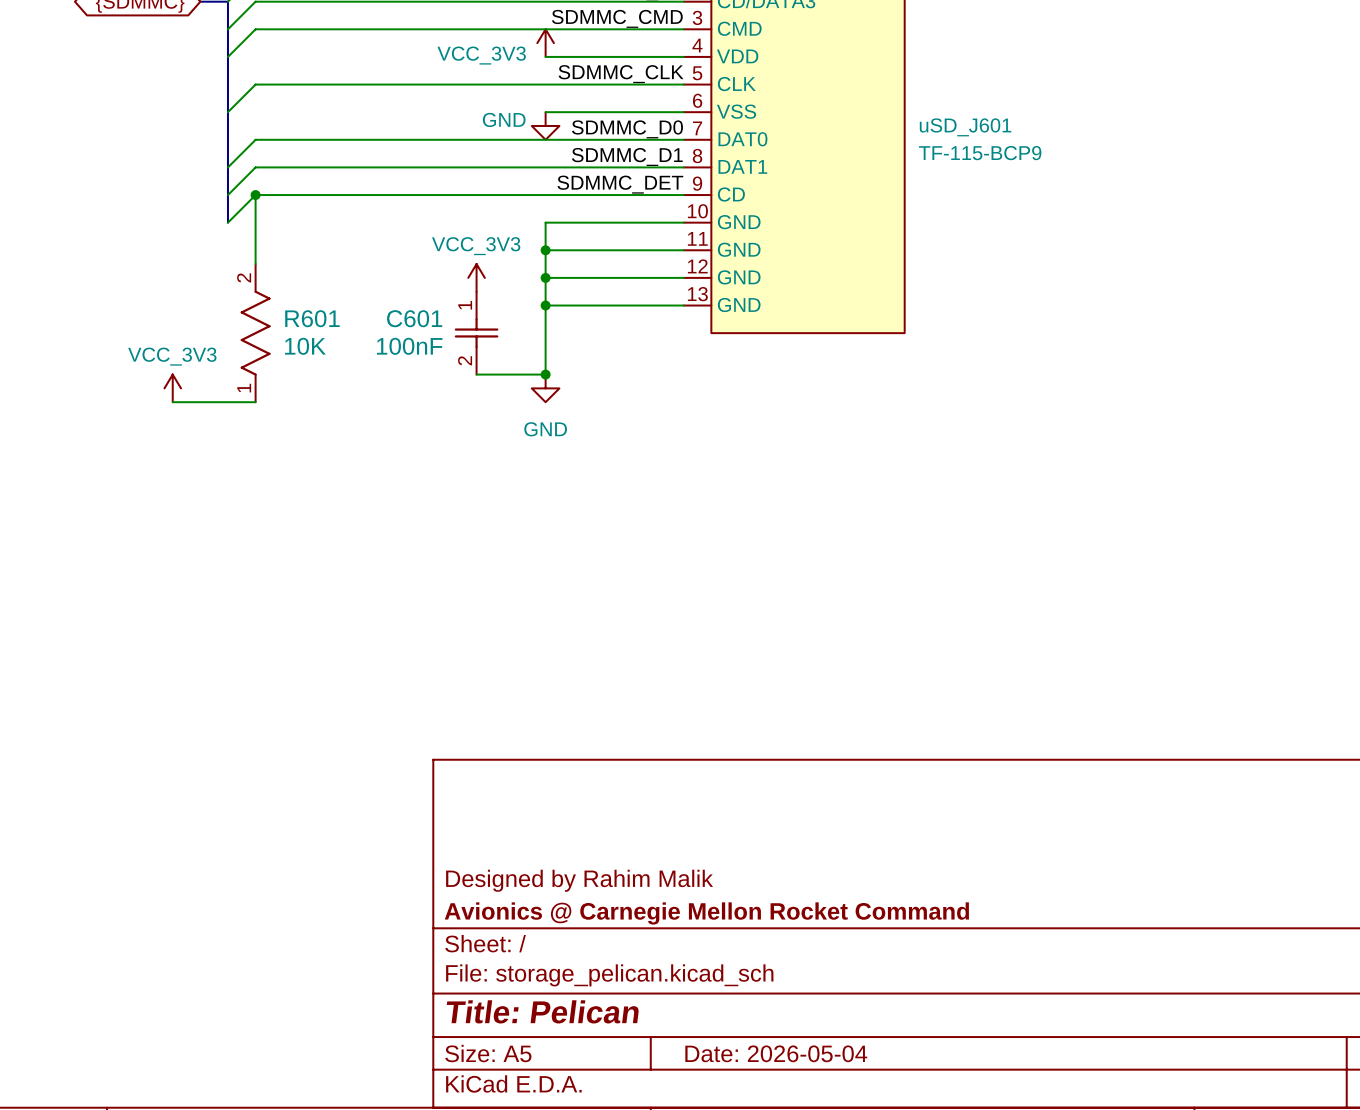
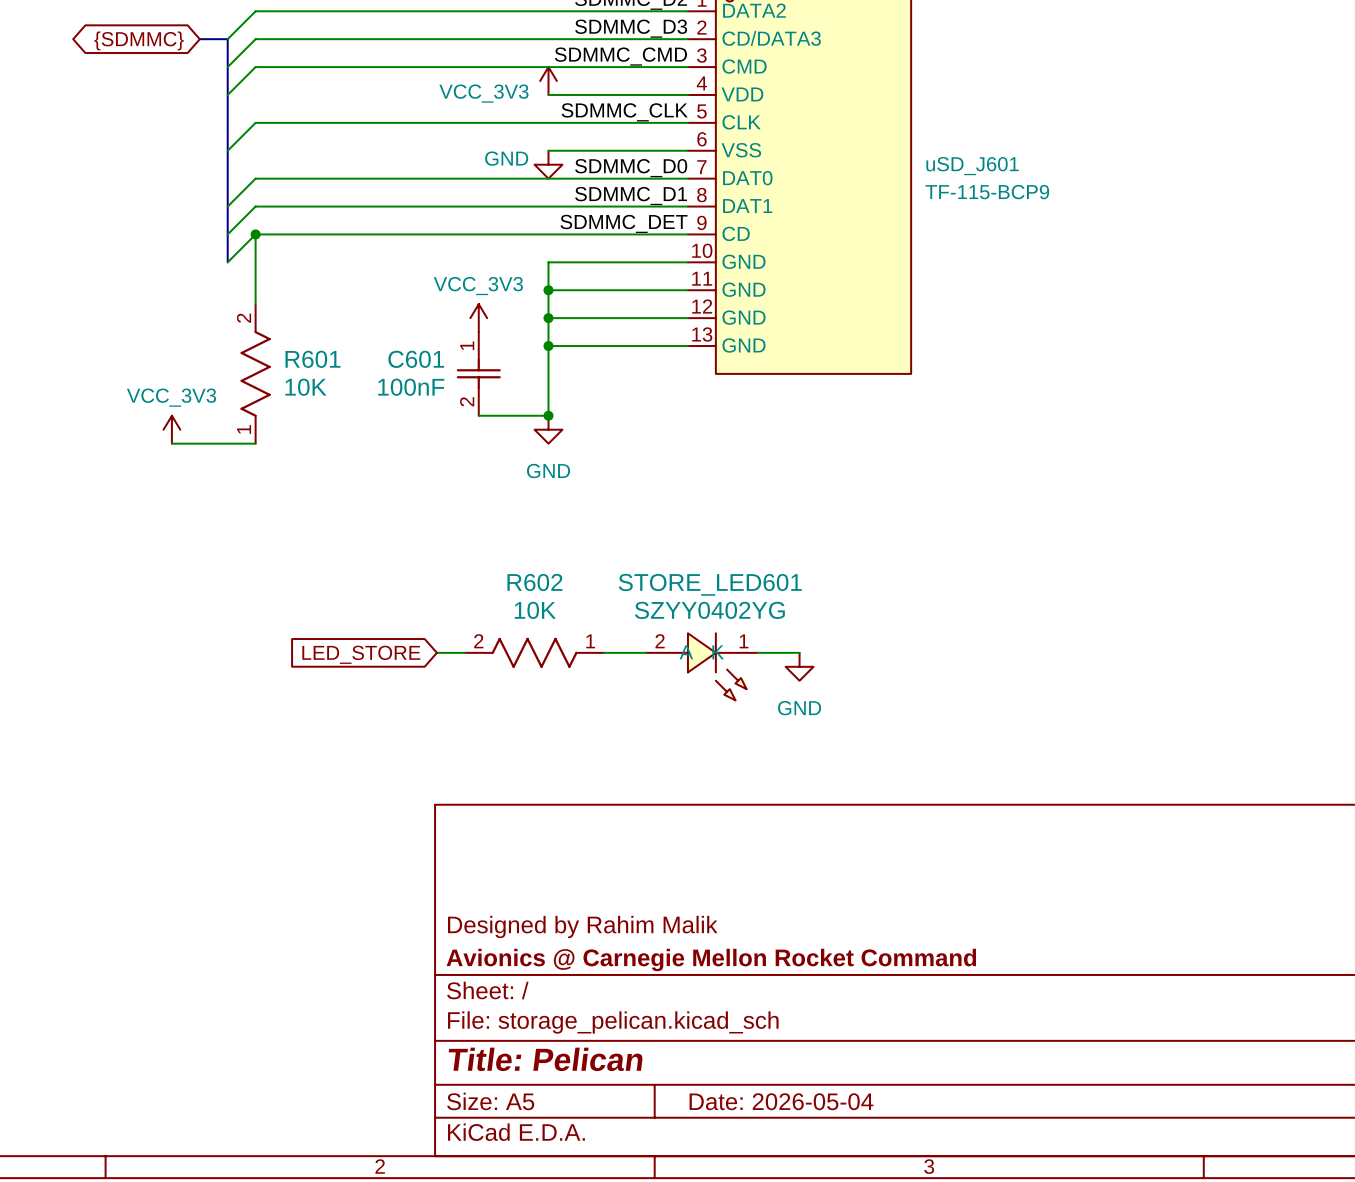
wire: none -> (436, 652) (464, 652)
R602: none -> 10K (534, 652)
wire: none -> (604, 652) (646, 652)
wire: none -> (757, 652) (799, 652)
global label: none -> LED_STORE (361, 654)
STORE_LED601: none -> SZYY0402YG (701, 666)
power symbol: none -> GND (799, 666)

